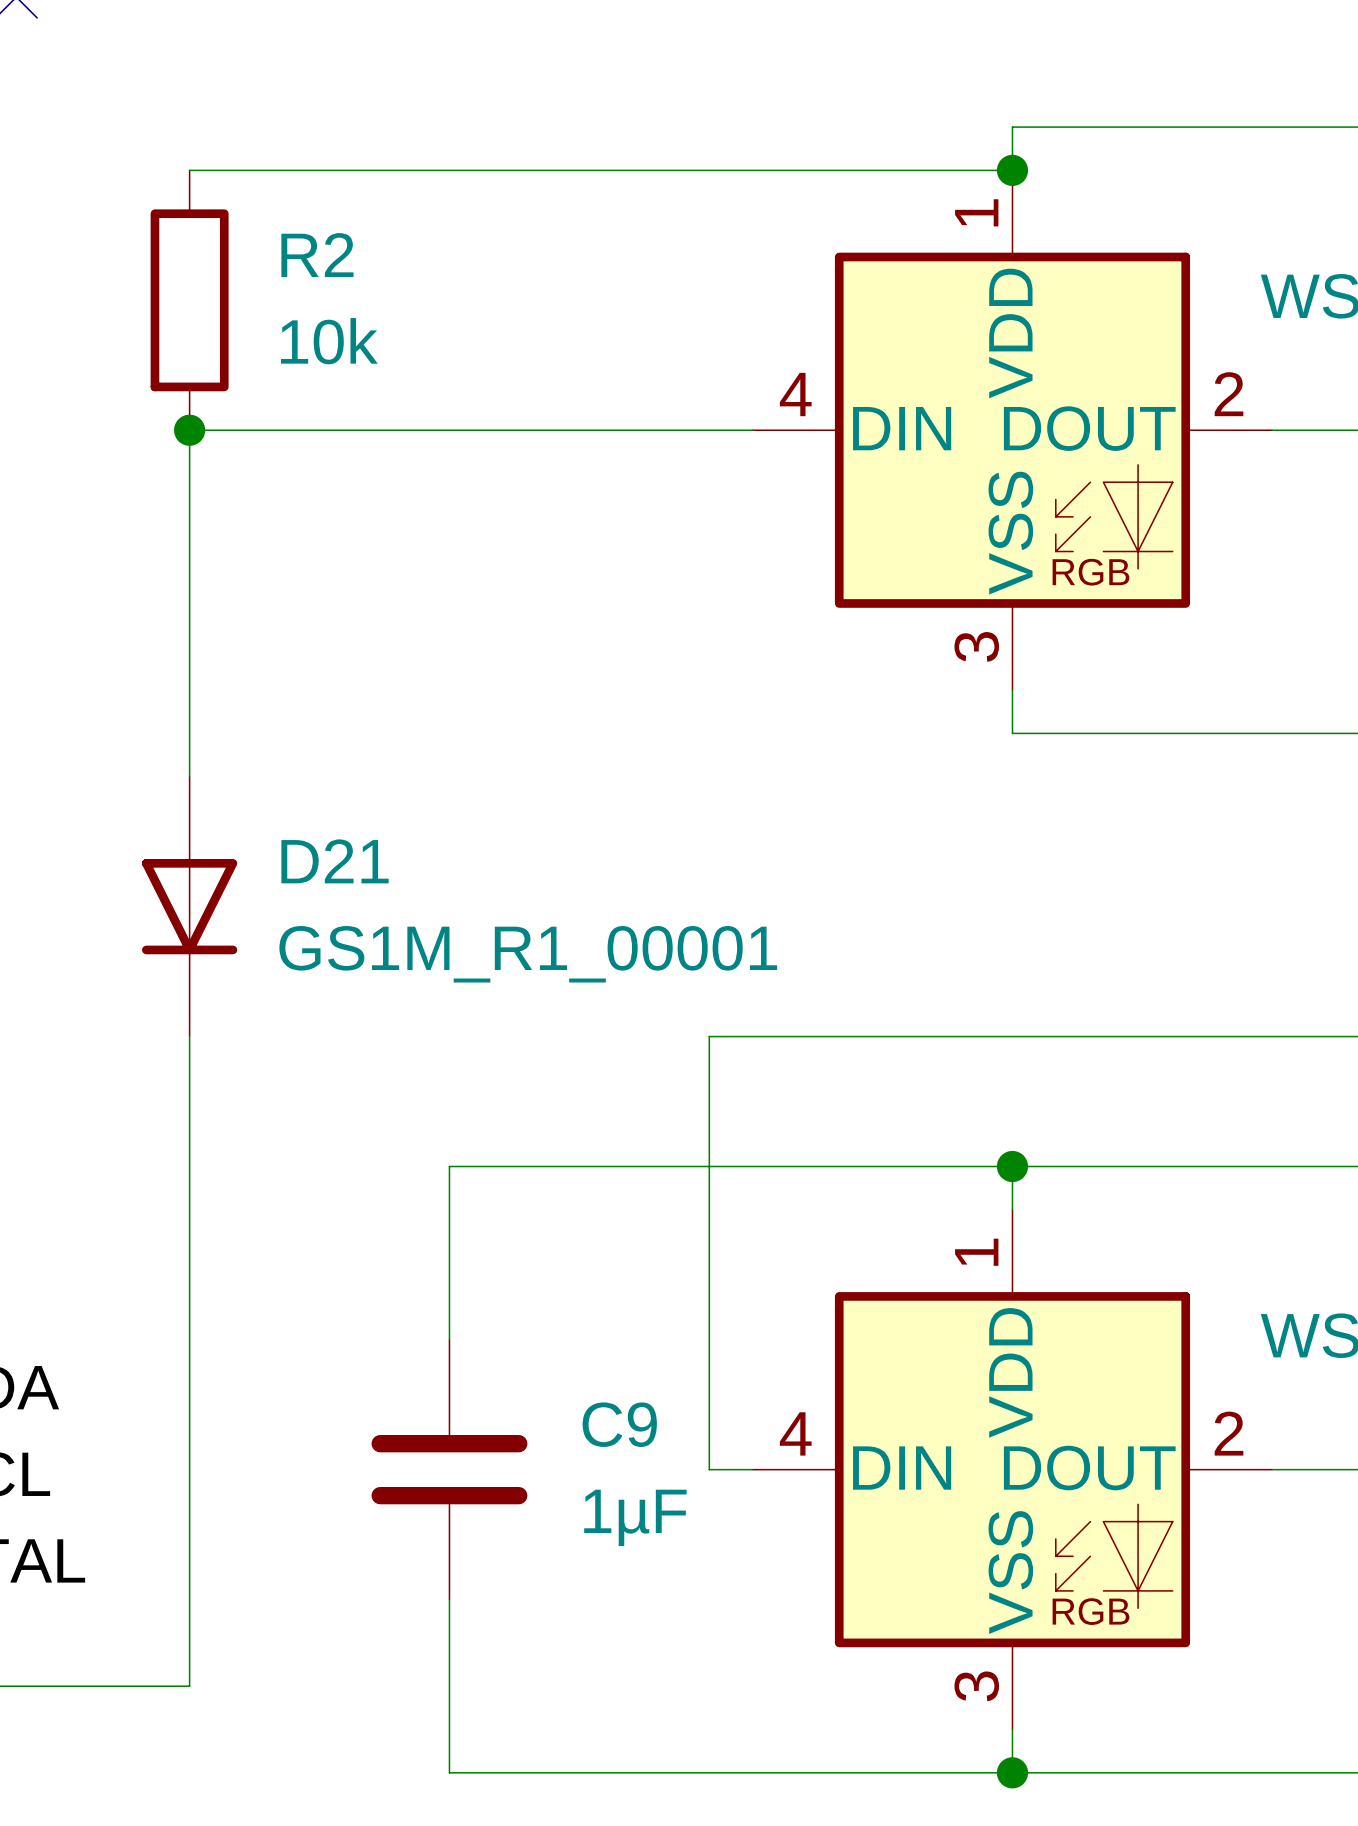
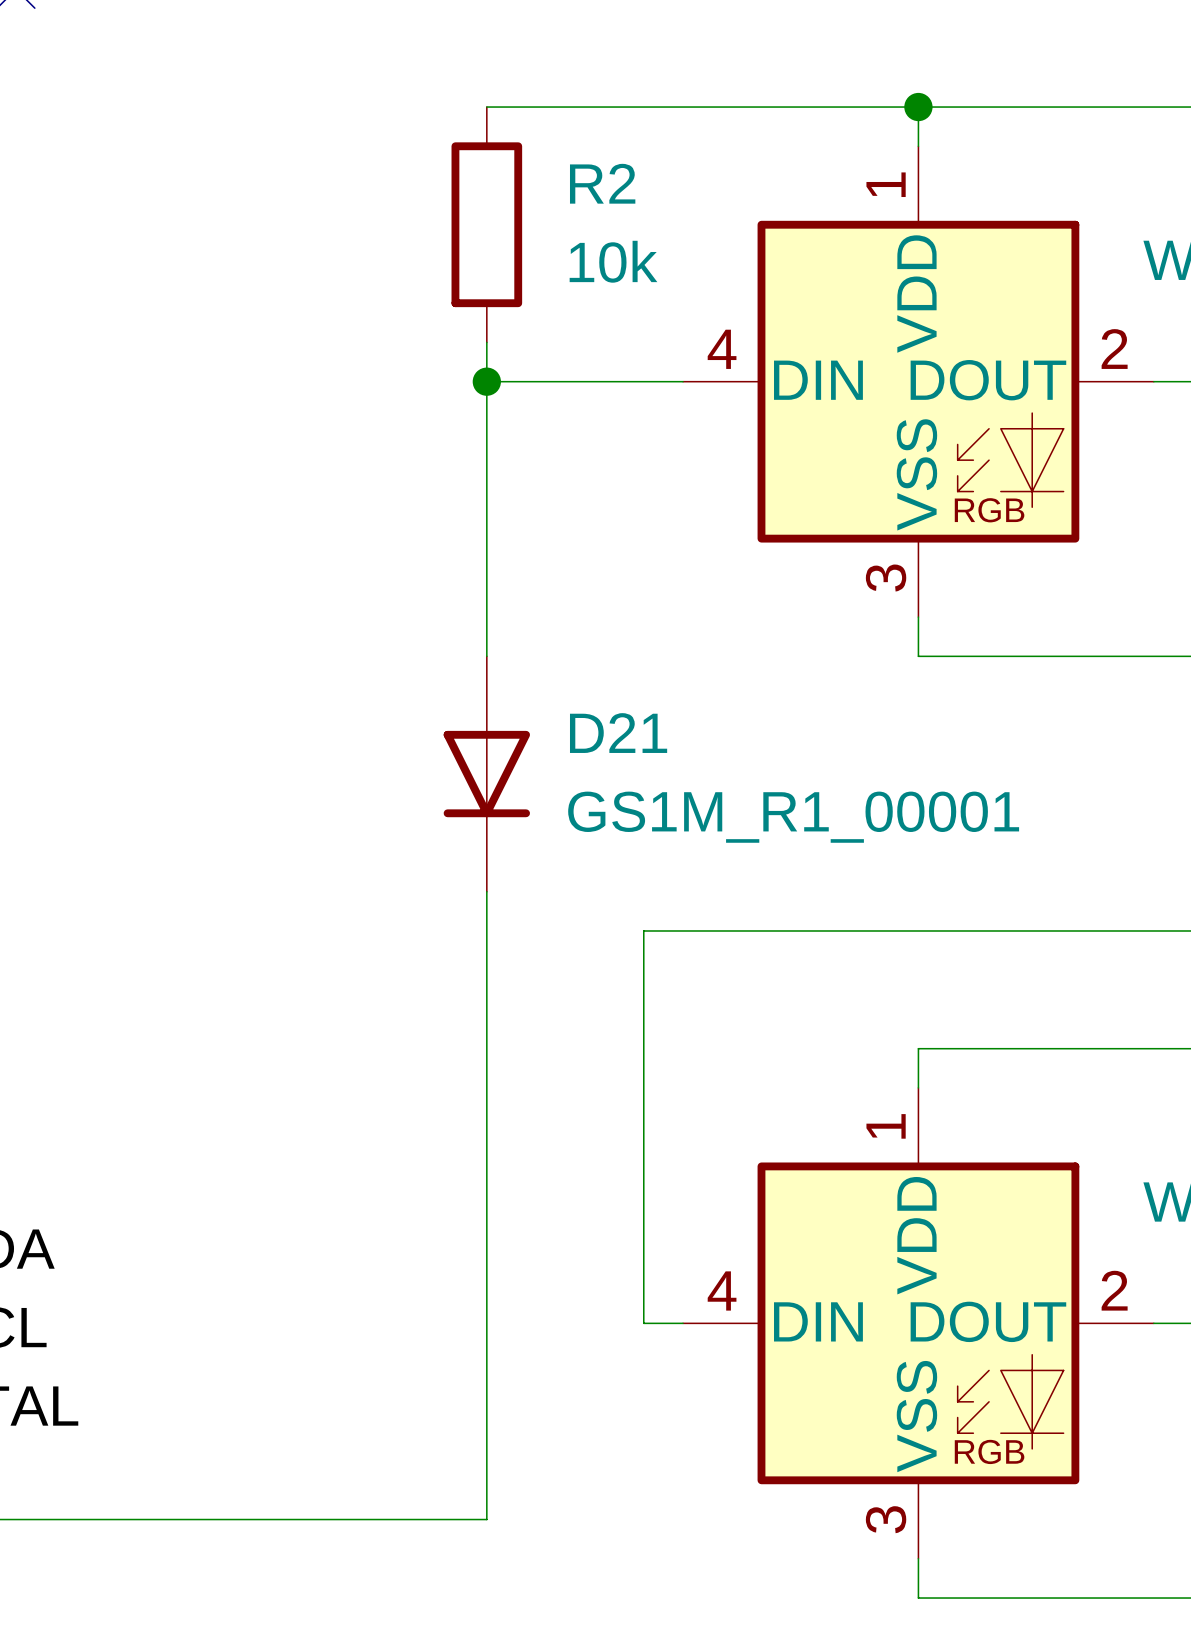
wire: none -> (486, 107) (918, 107)
wire: (189, 170) (1012, 170) -> none
junction position: (1012, 170) -> (918, 107)
R2 position: (189, 300) -> (486, 224)
wire: none -> (486, 342) (486, 656)
junction: (189, 430) -> none
wire: (536, 430) (189, 430) (189, 776) -> none
junction: none -> (486, 381)
D21 position: (189, 906) -> (486, 774)
wire: (189, 1036) (189, 1686) -> (486, 891) (486, 1519) (172, 1519)
wire: (1012, 1166) (449, 1166) (449, 1339) -> none
junction: (1012, 1166) -> none
C9: 1µF (449, 1469) -> none
wire: (449, 1599) (449, 1772) (1012, 1772) -> none
junction: (1012, 1772) -> none

